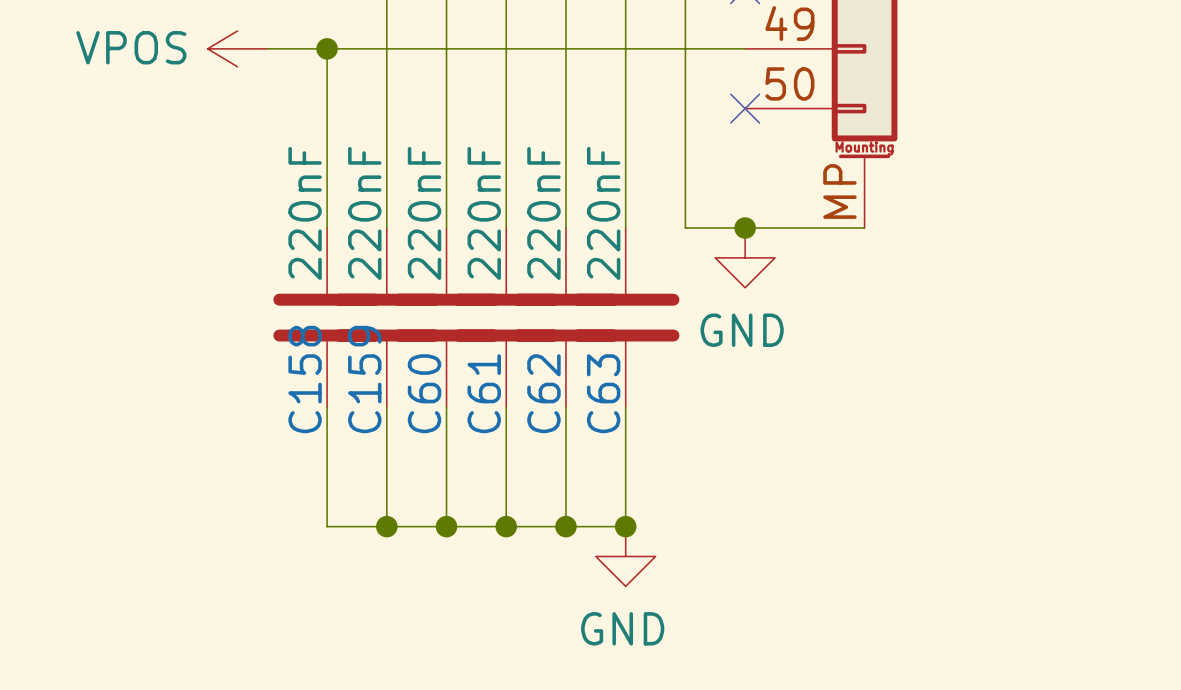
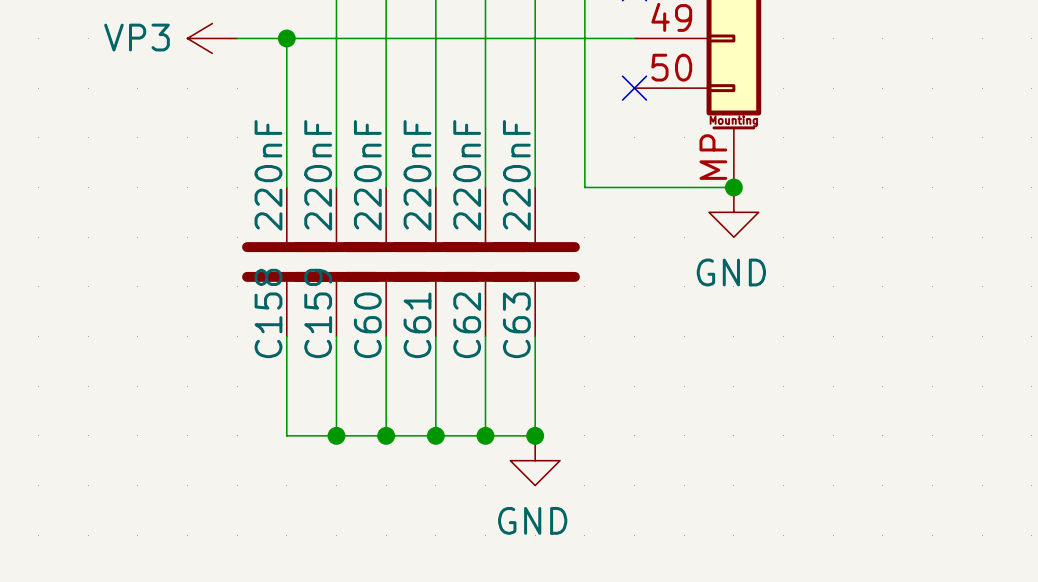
power symbol: VPOS (237, 48) -> VP3 (212, 38)
junction position: (745, 228) -> (733, 187)
power symbol position: GND (745, 257) -> GND (733, 212)

